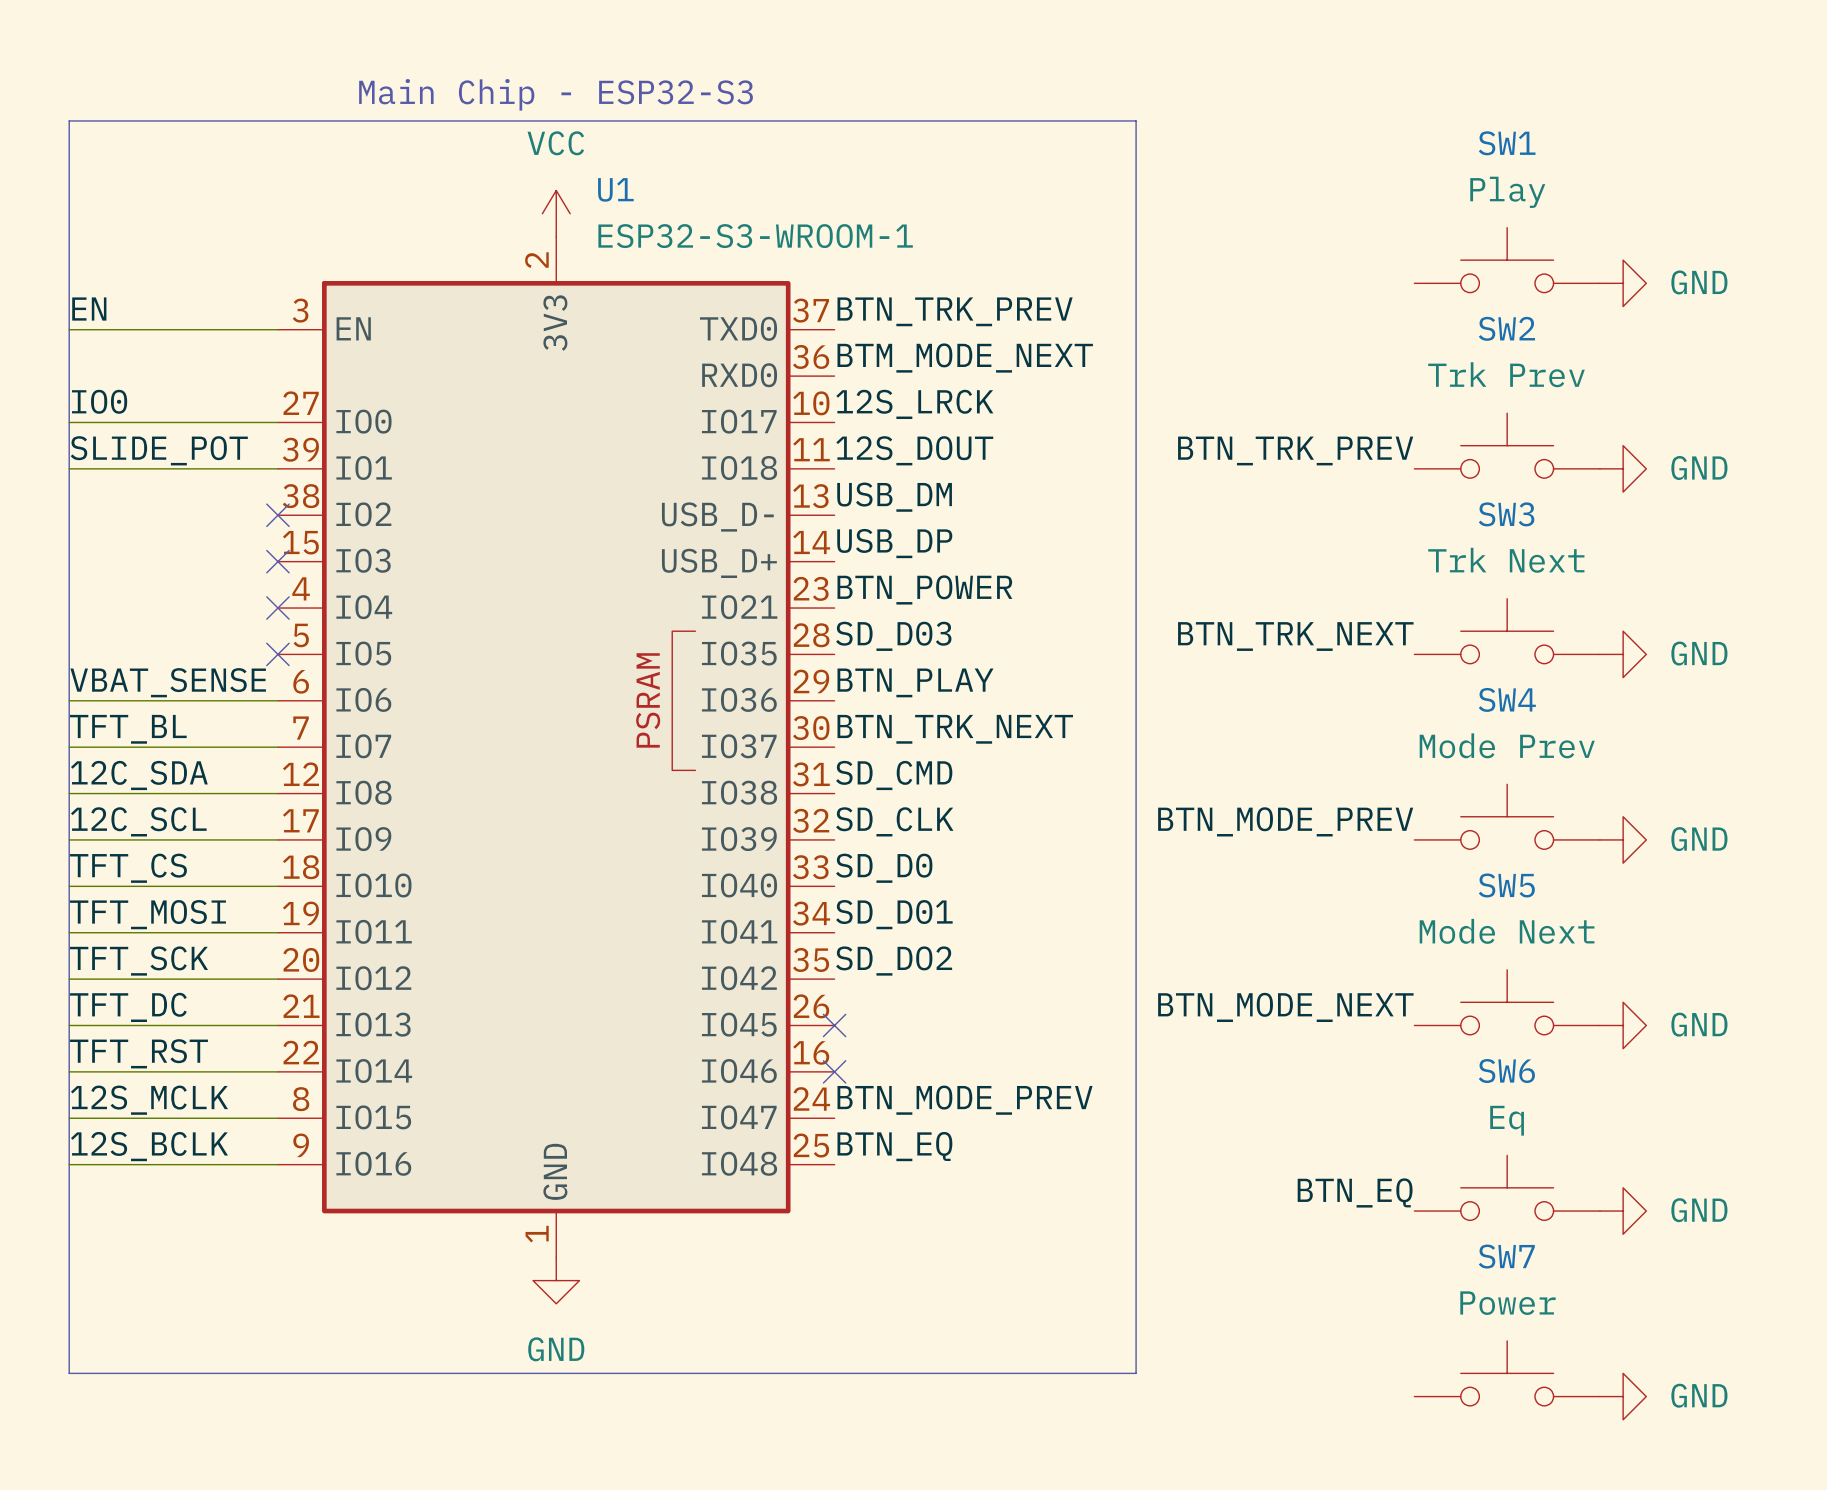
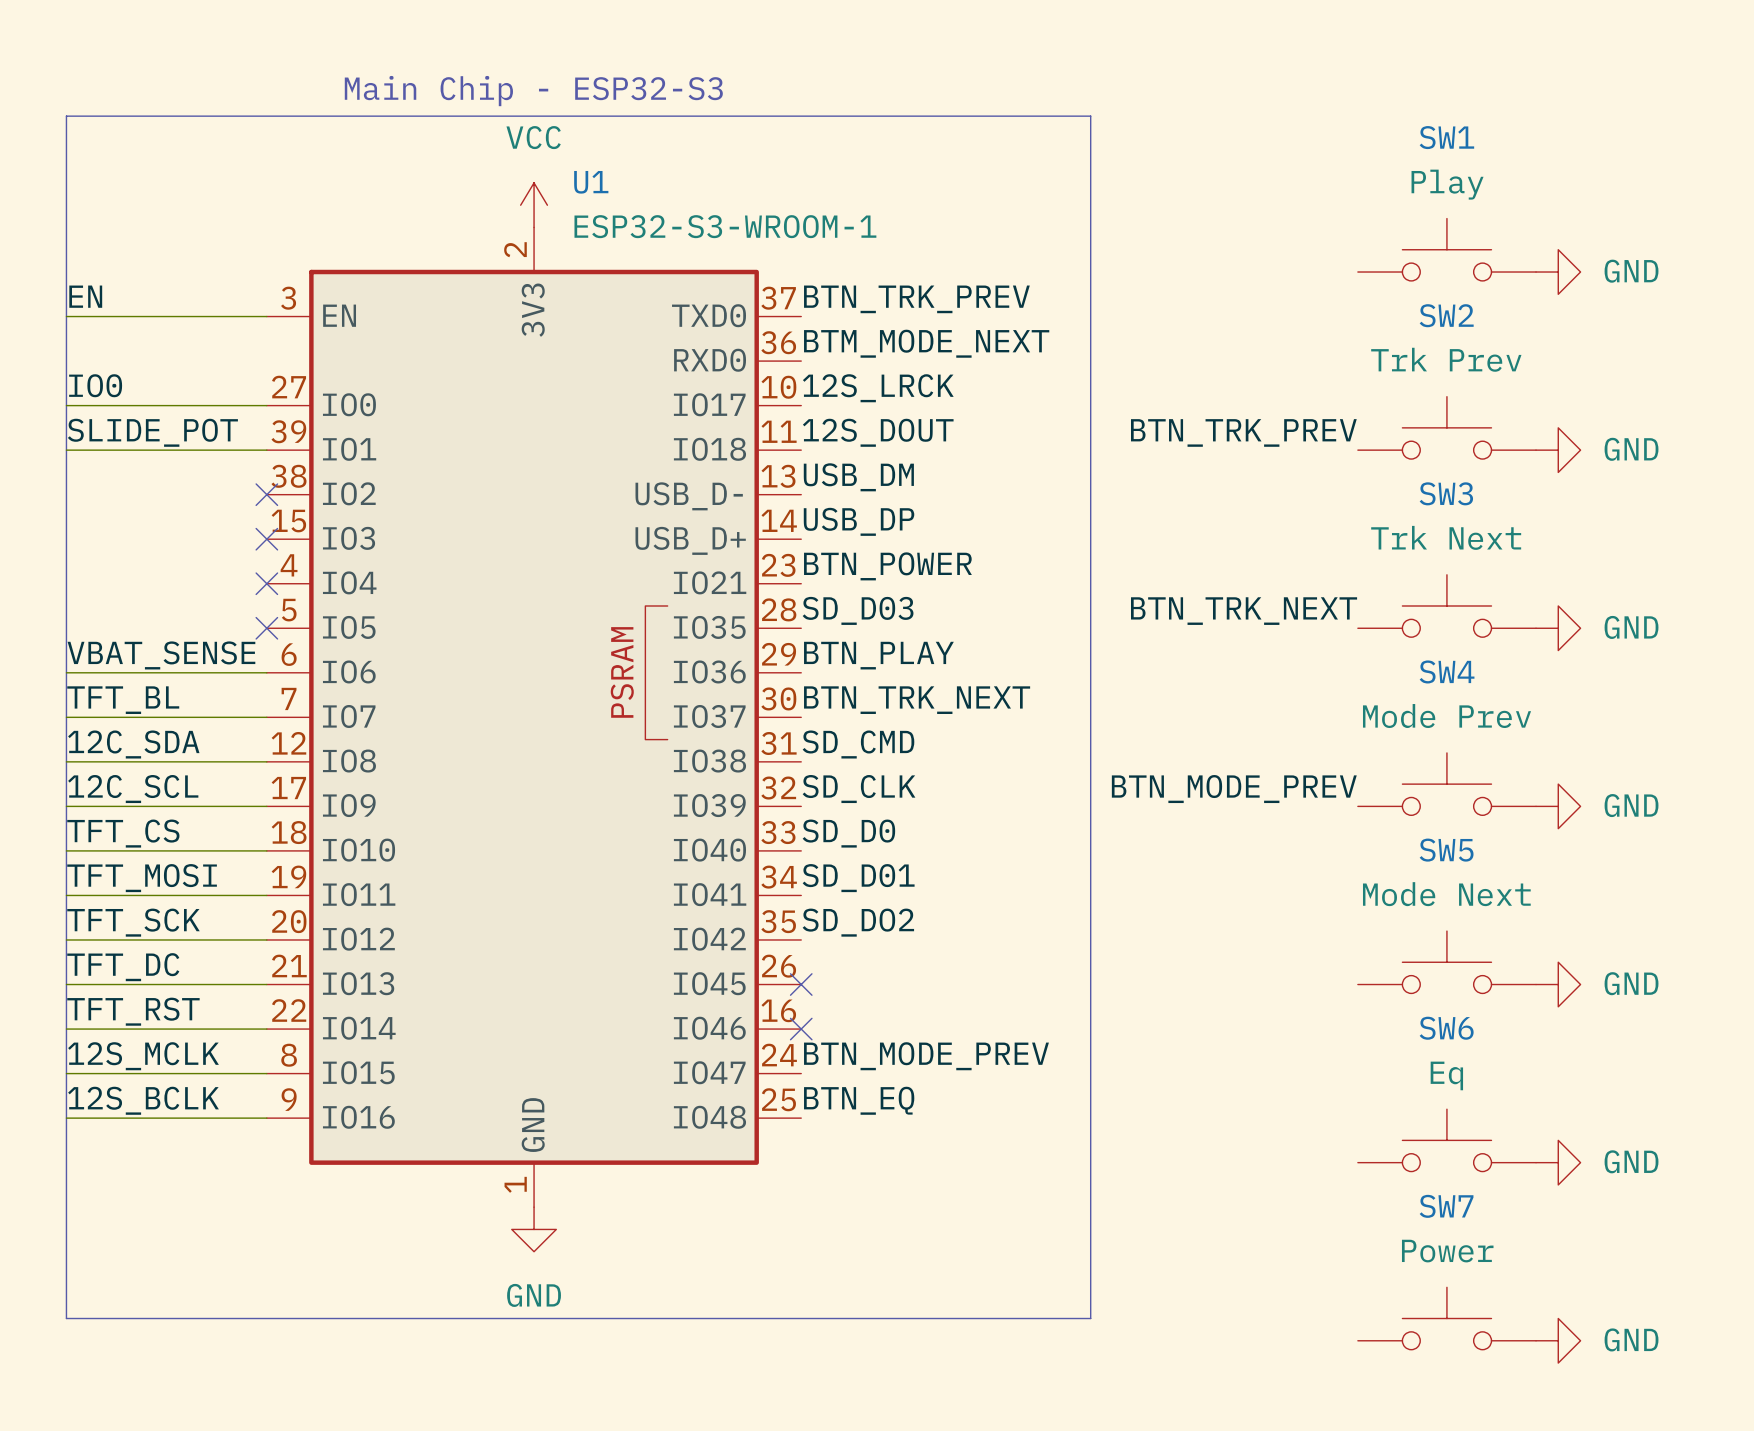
label: BTN_MODE_NEXT (1285, 1007) -> none
label: BTN_EQ (1355, 1192) -> none

